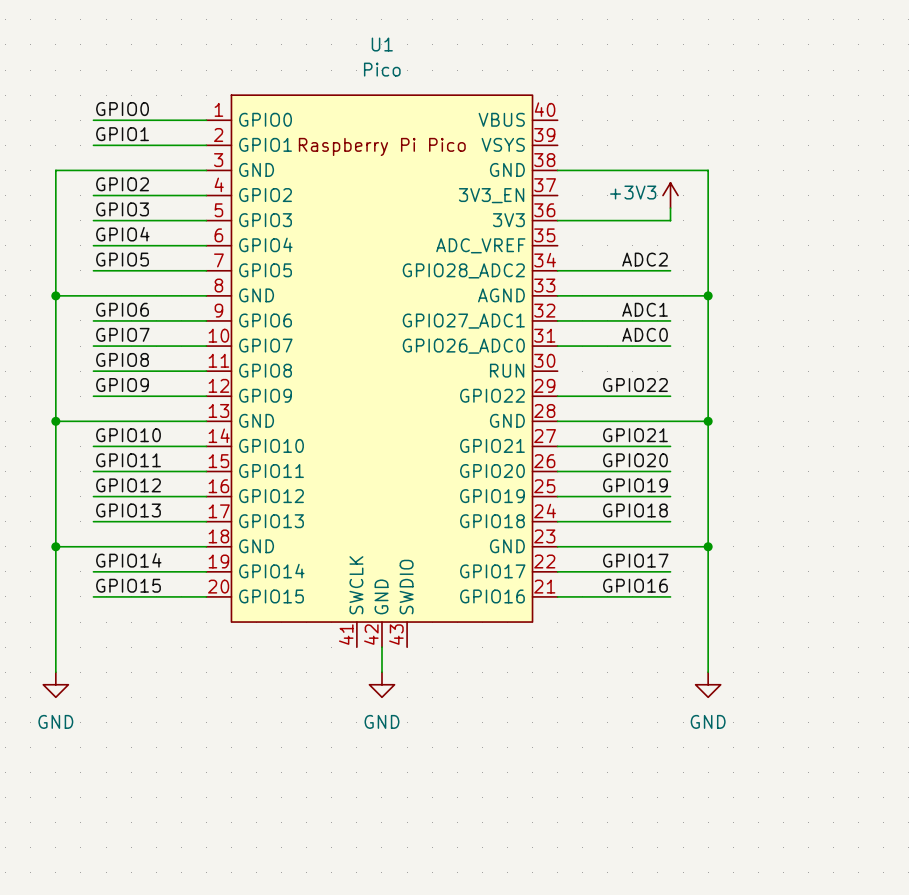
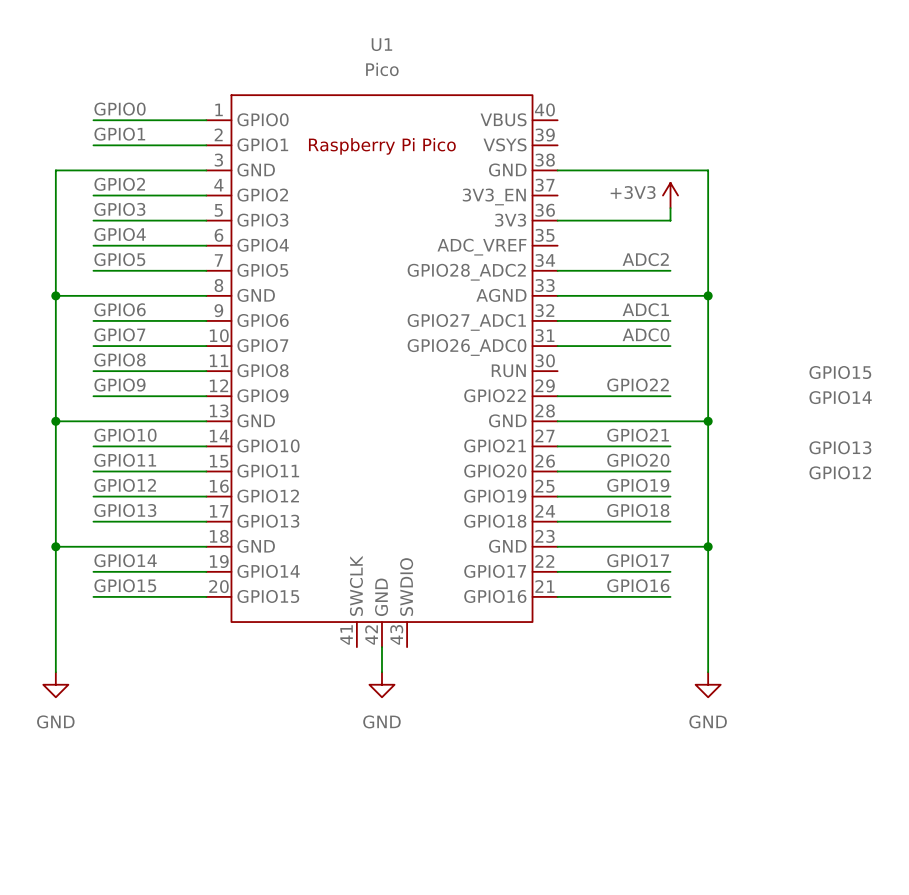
label: none -> GPIO15 (840, 372)
label: none -> GPIO14 (840, 397)
label: none -> GPIO13 (840, 447)
label: none -> GPIO12 (840, 472)

